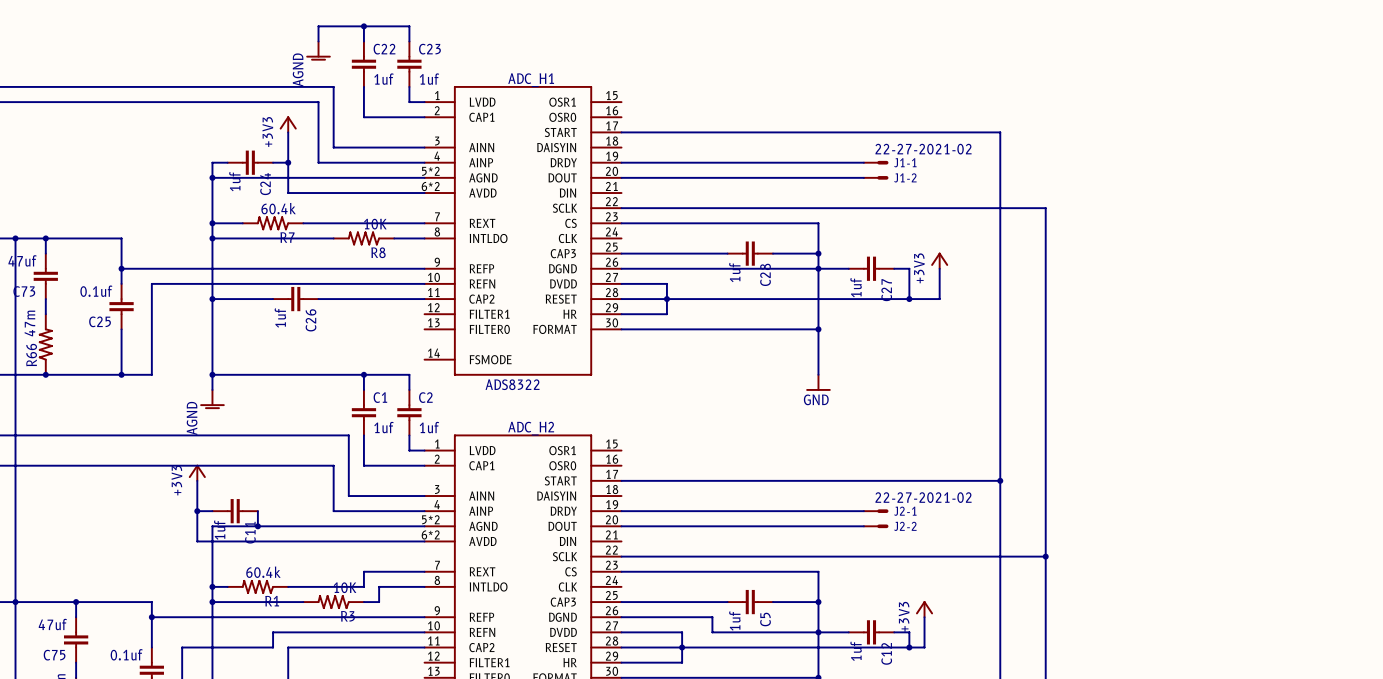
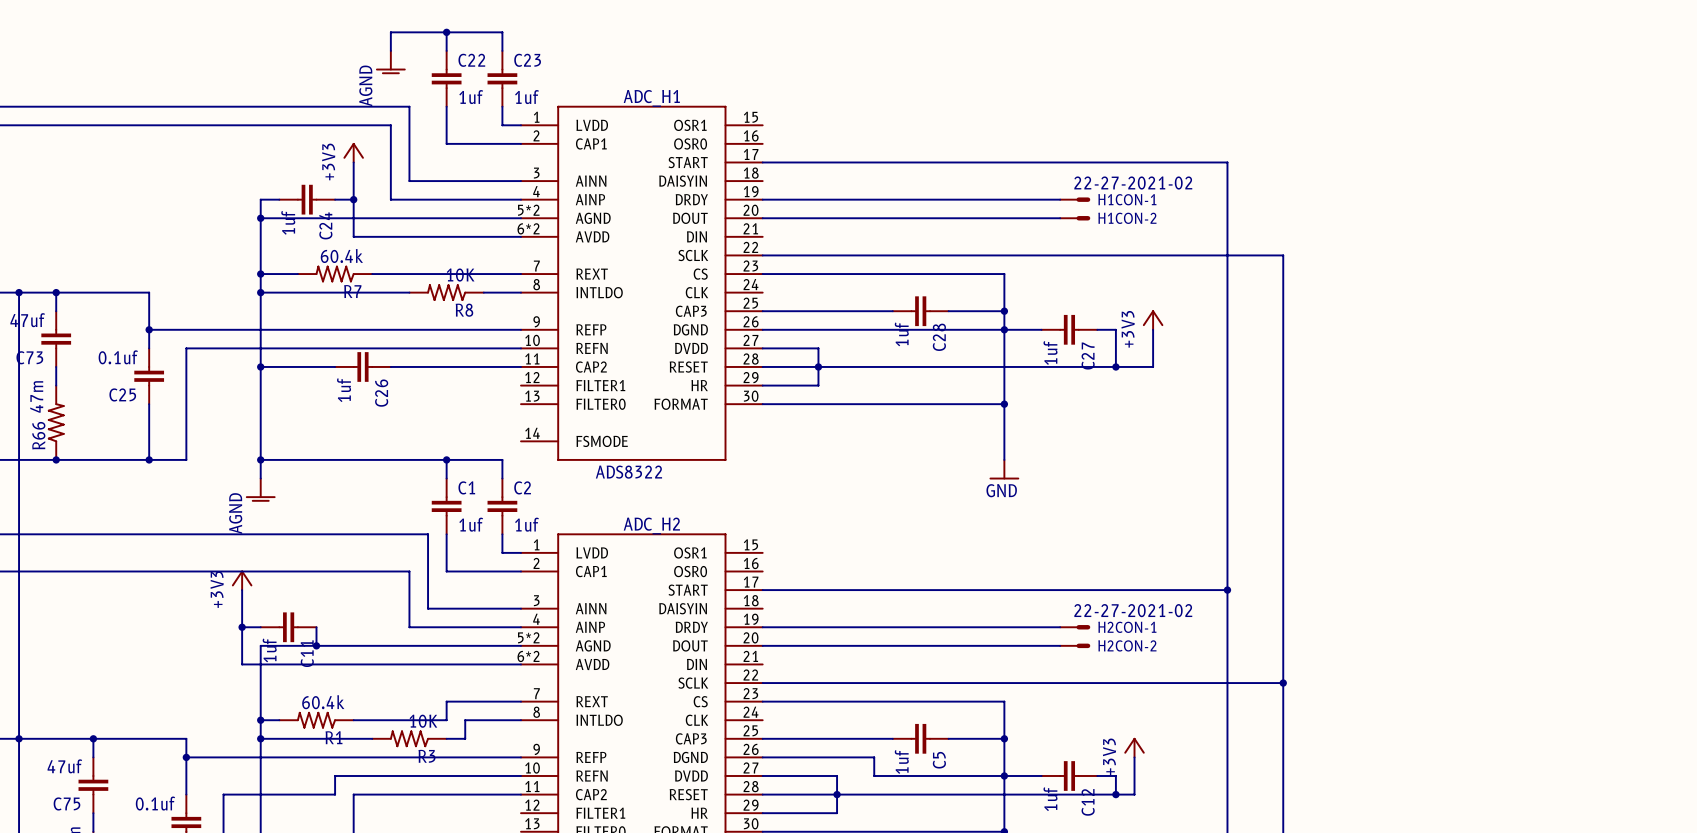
J1-1 name: J1-1 (905, 162) -> H1CON-1 (1127, 199)
J1-2 name: J1-2 (905, 177) -> H1CON-2 (1127, 218)
J2-1 name: J2-1 (905, 511) -> H2CON-1 (1127, 627)
J2-2 name: J2-2 (905, 526) -> H2CON-2 (1127, 645)

